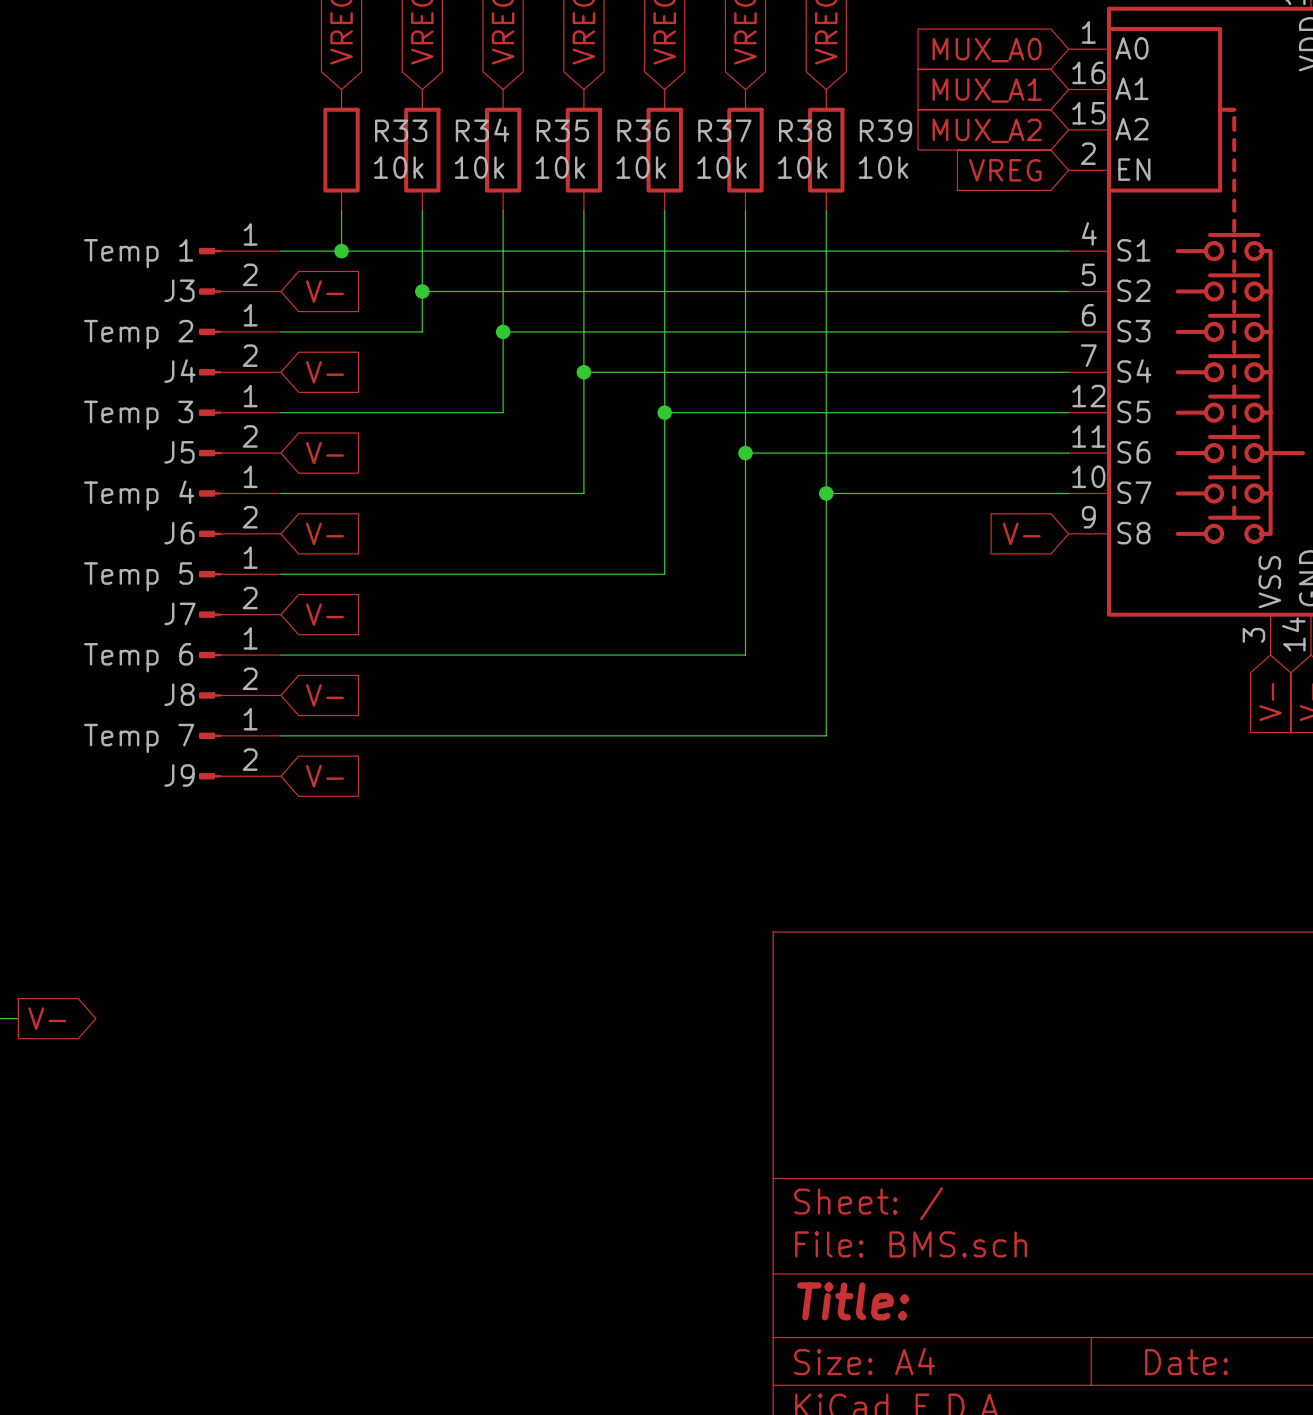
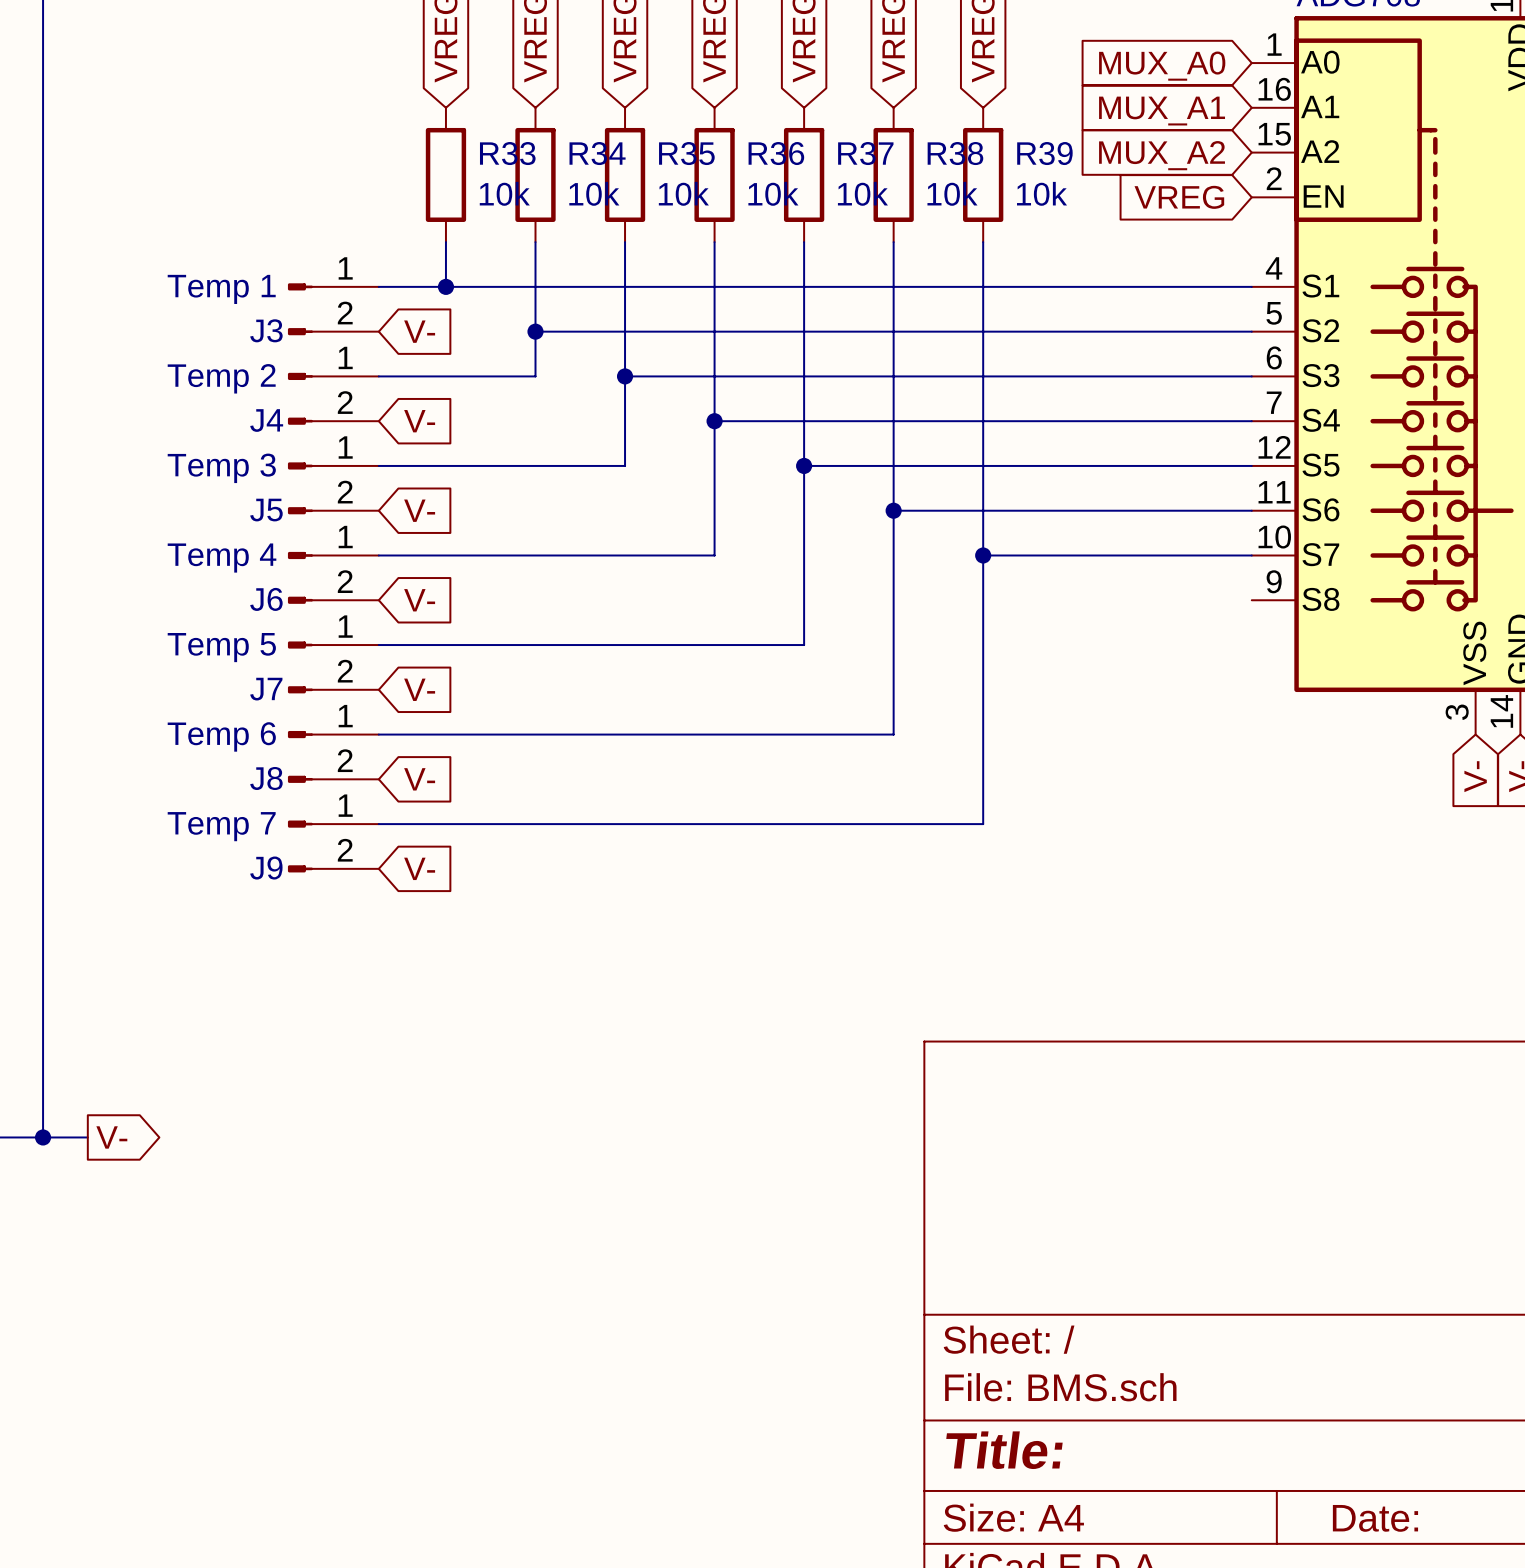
global label: V- (1021, 533) -> none

